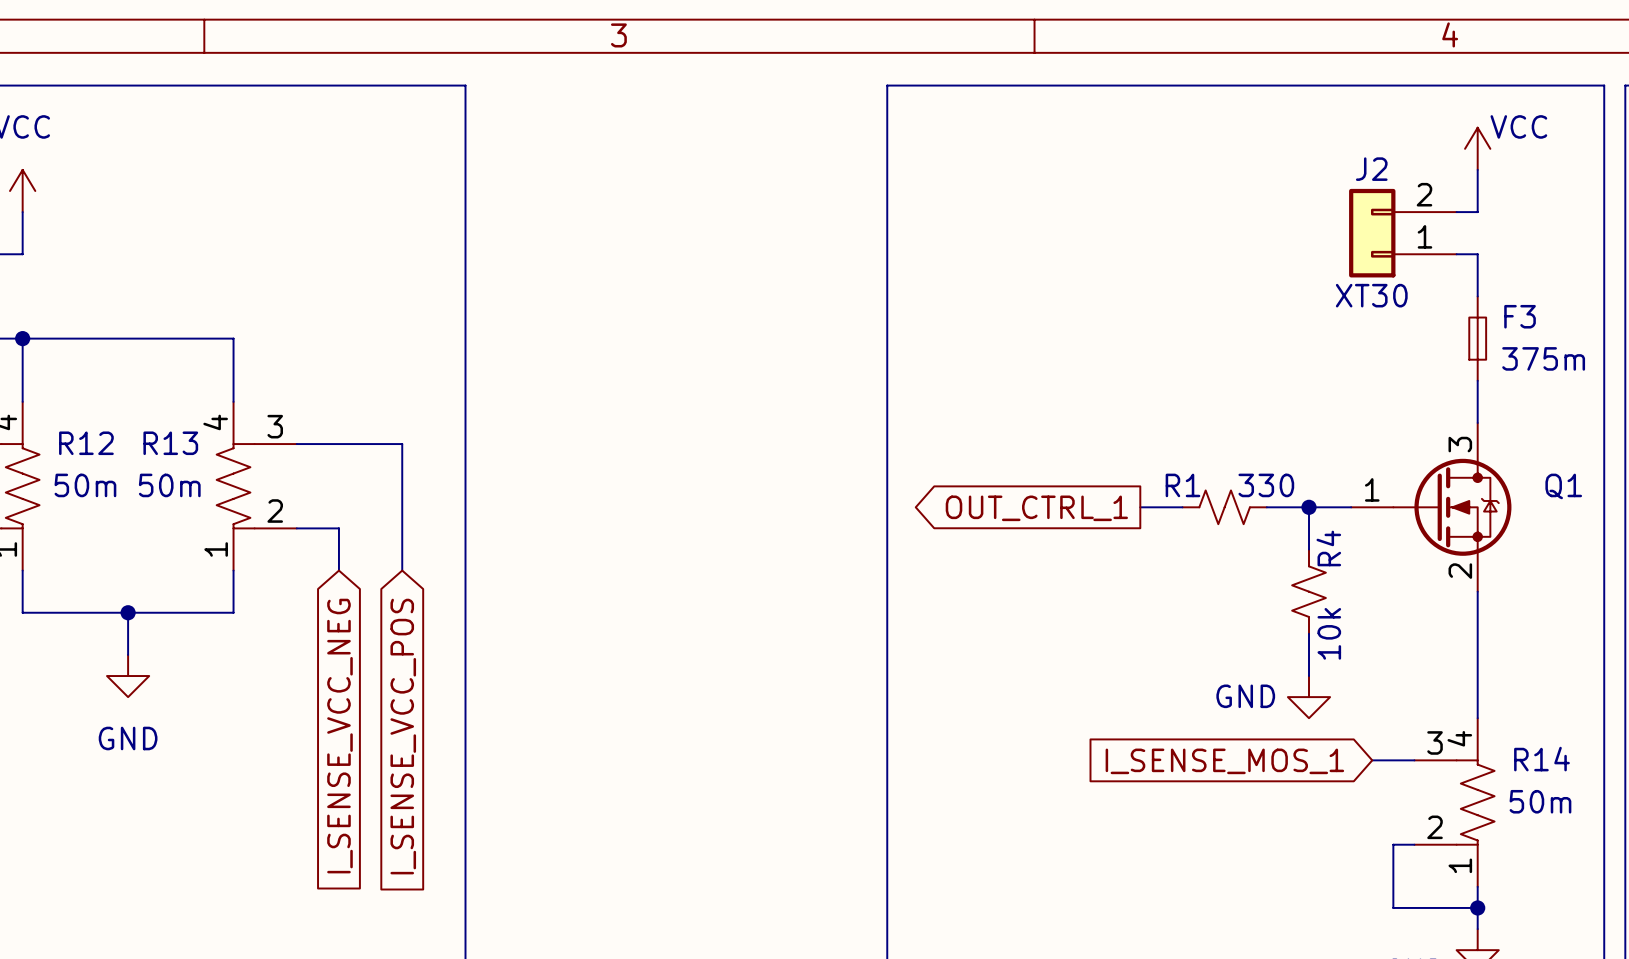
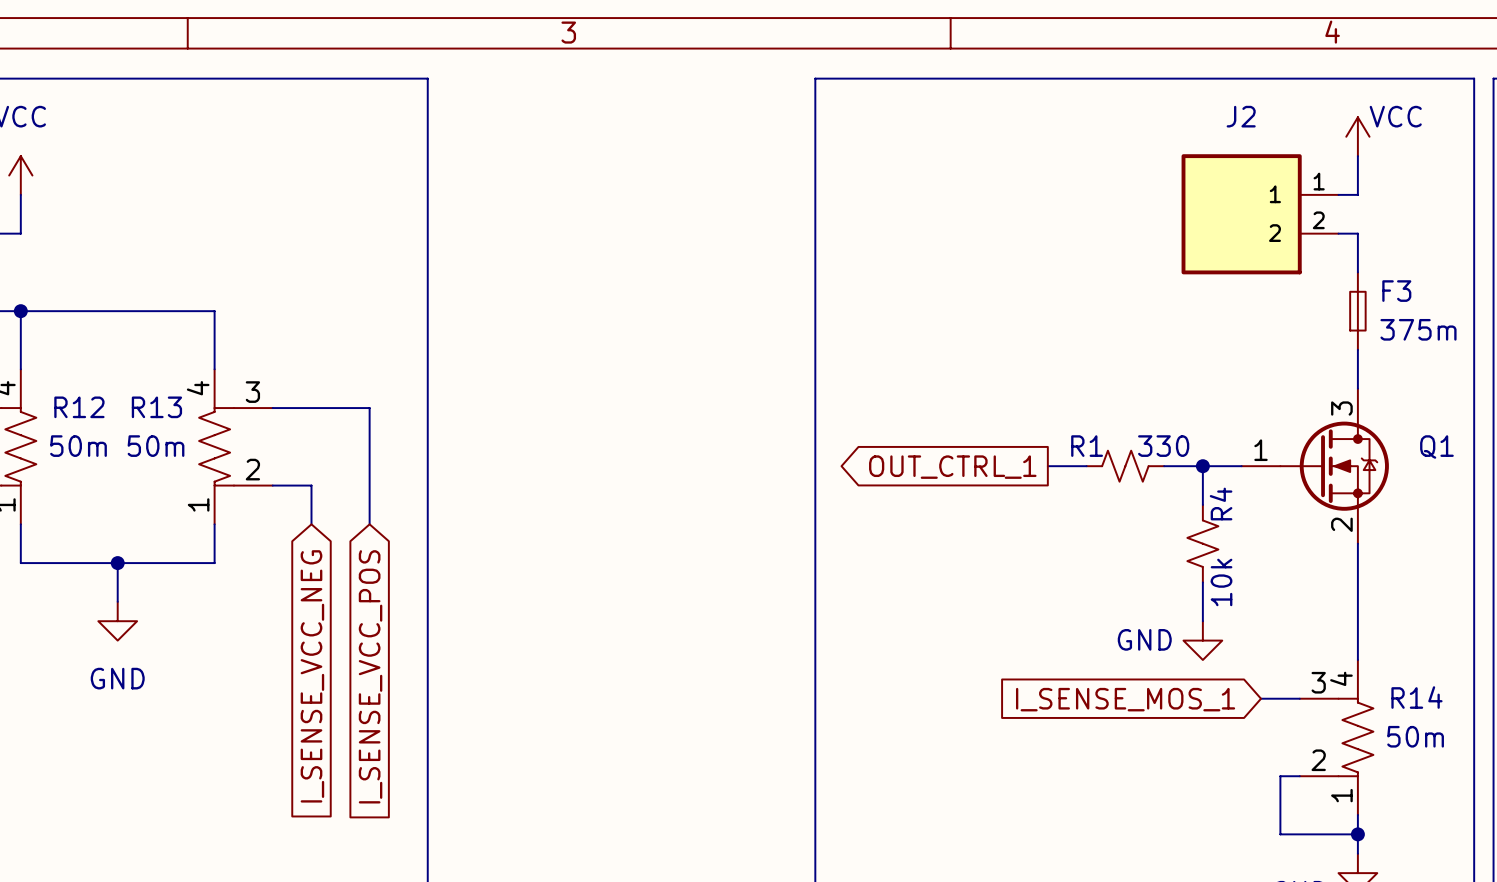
J2 name position: J2 (1371, 169) -> J2 (1241, 116)
J2 symbol: [1349, 188, 1457, 278] -> [1181, 154, 1339, 275]
J2 value: XT30 (1371, 295) -> none

